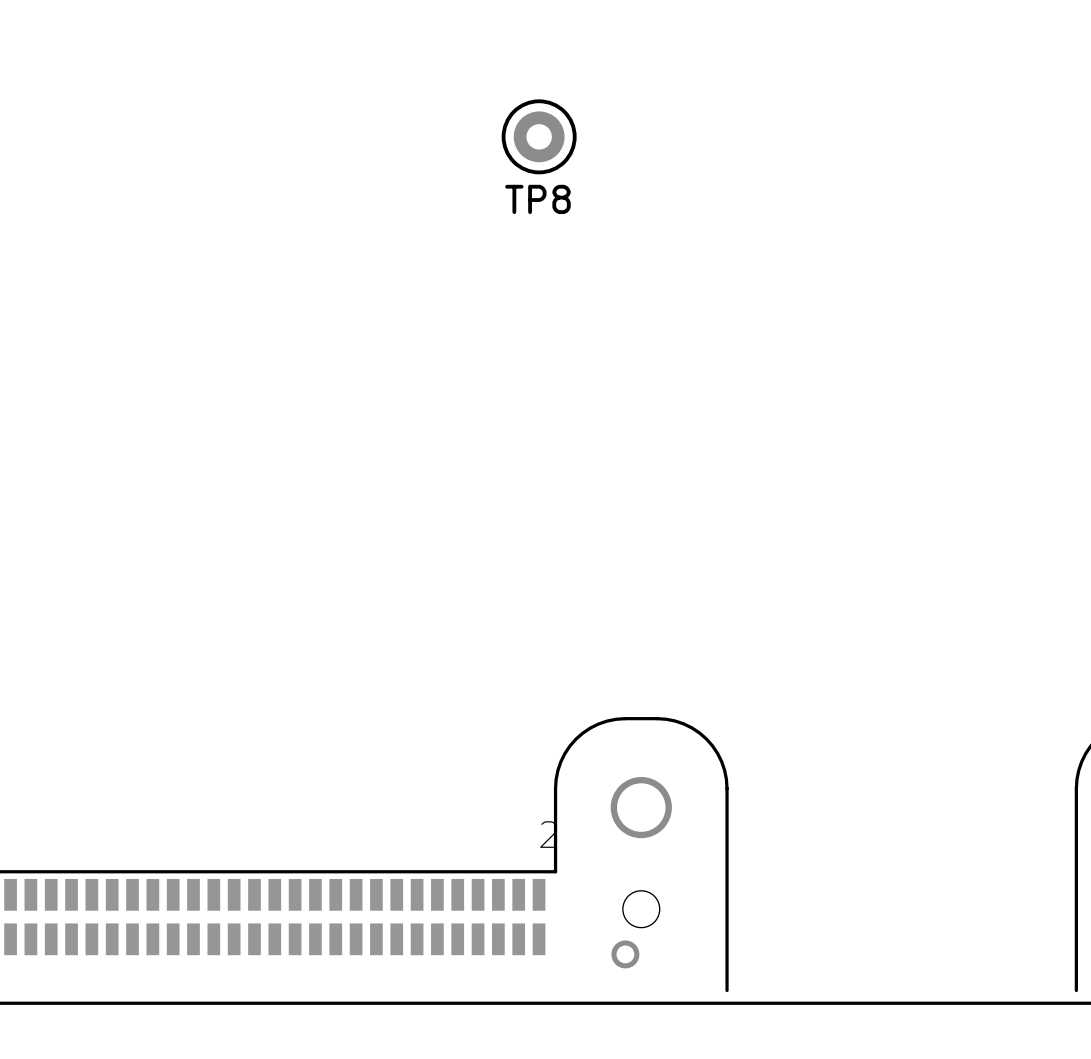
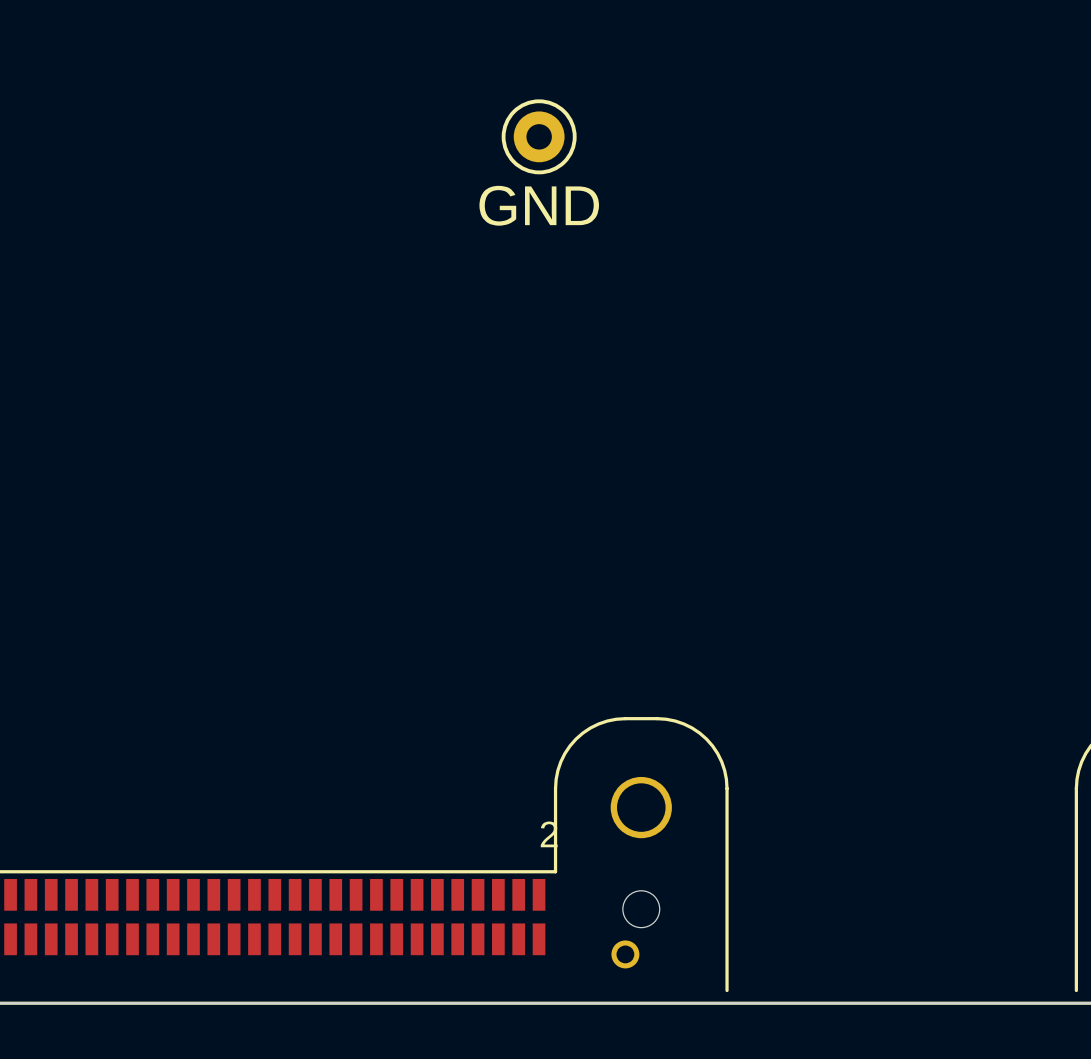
TP8 name: TP8 (537, 199) -> GND (539, 205)

